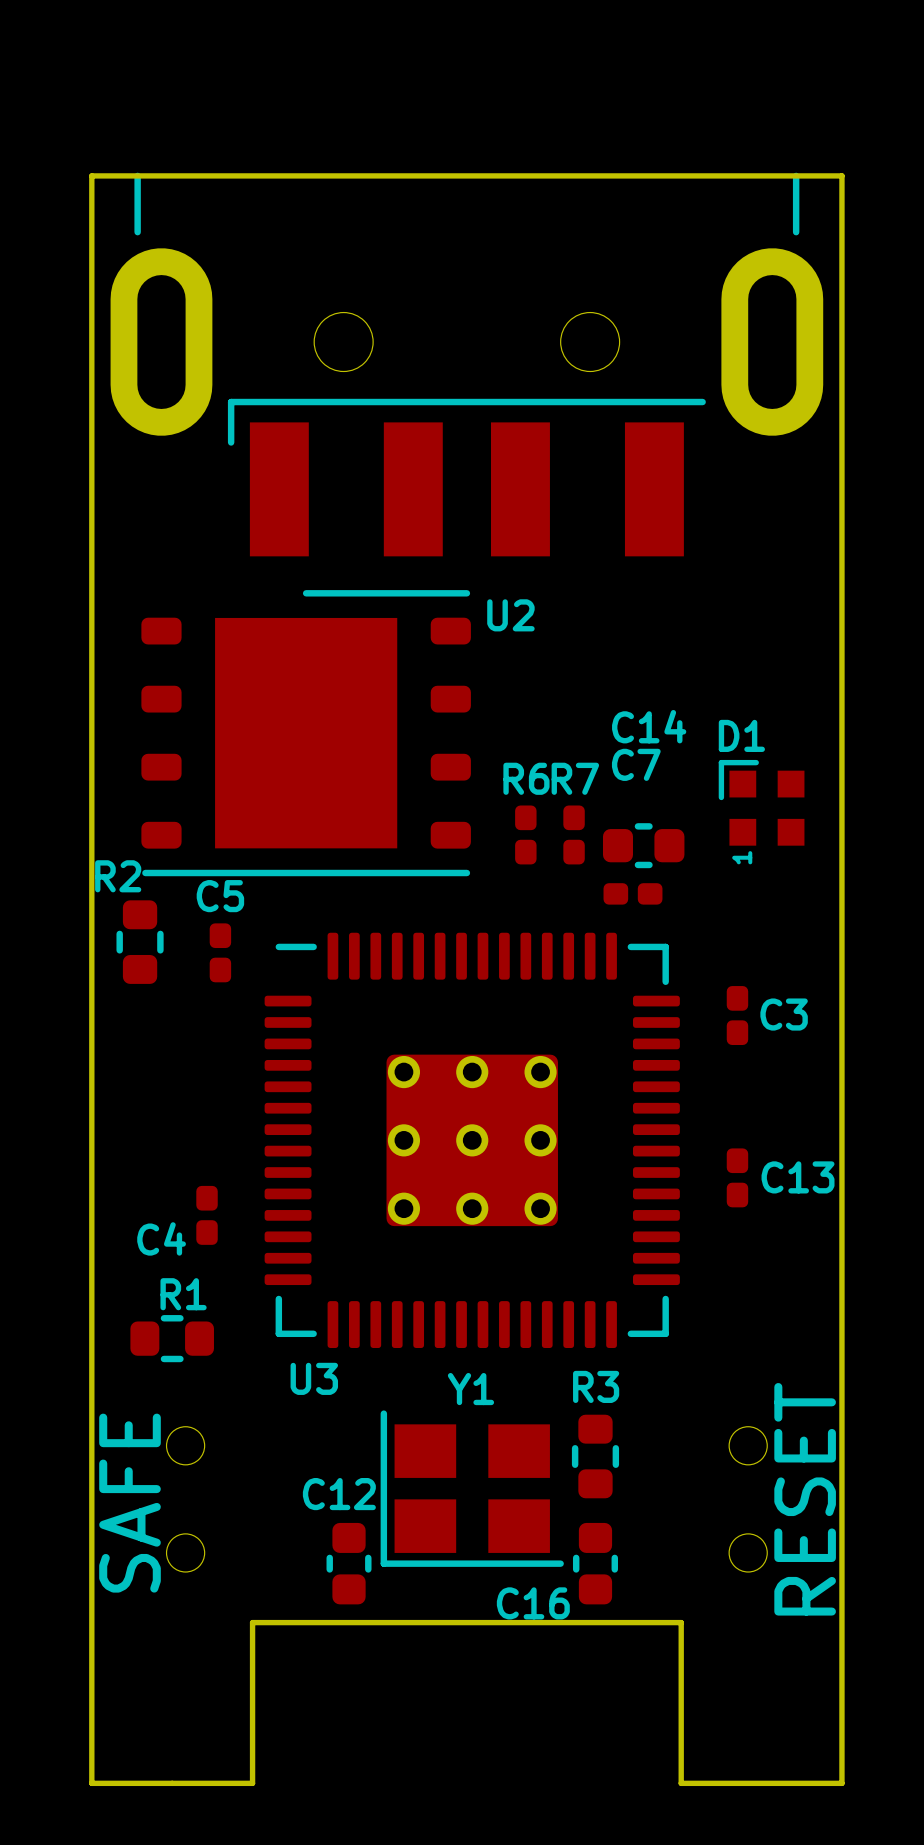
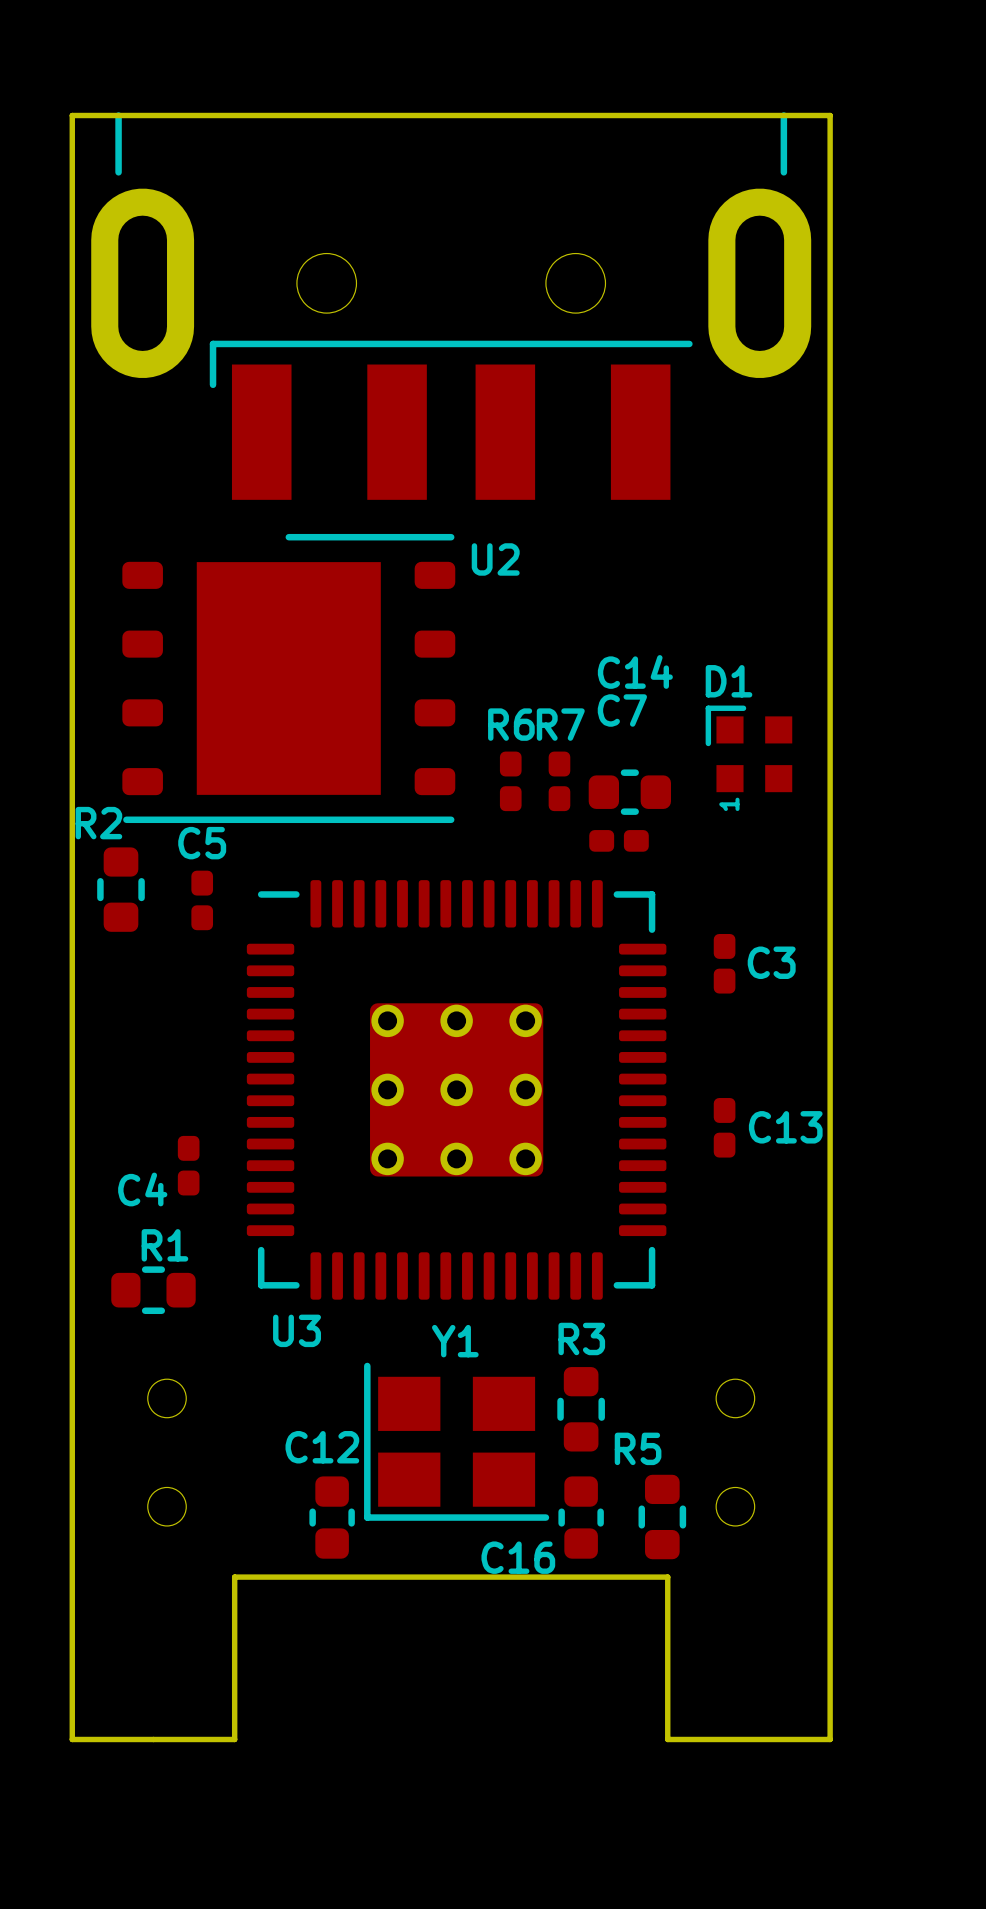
text: RESET (805, 1499) -> none
text: SAFE (130, 1503) -> none
R5: none -> (662, 1517)

